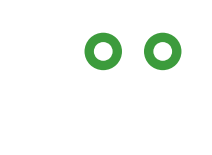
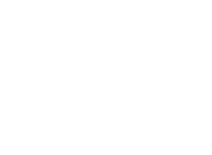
part: (132, 51) -> none

